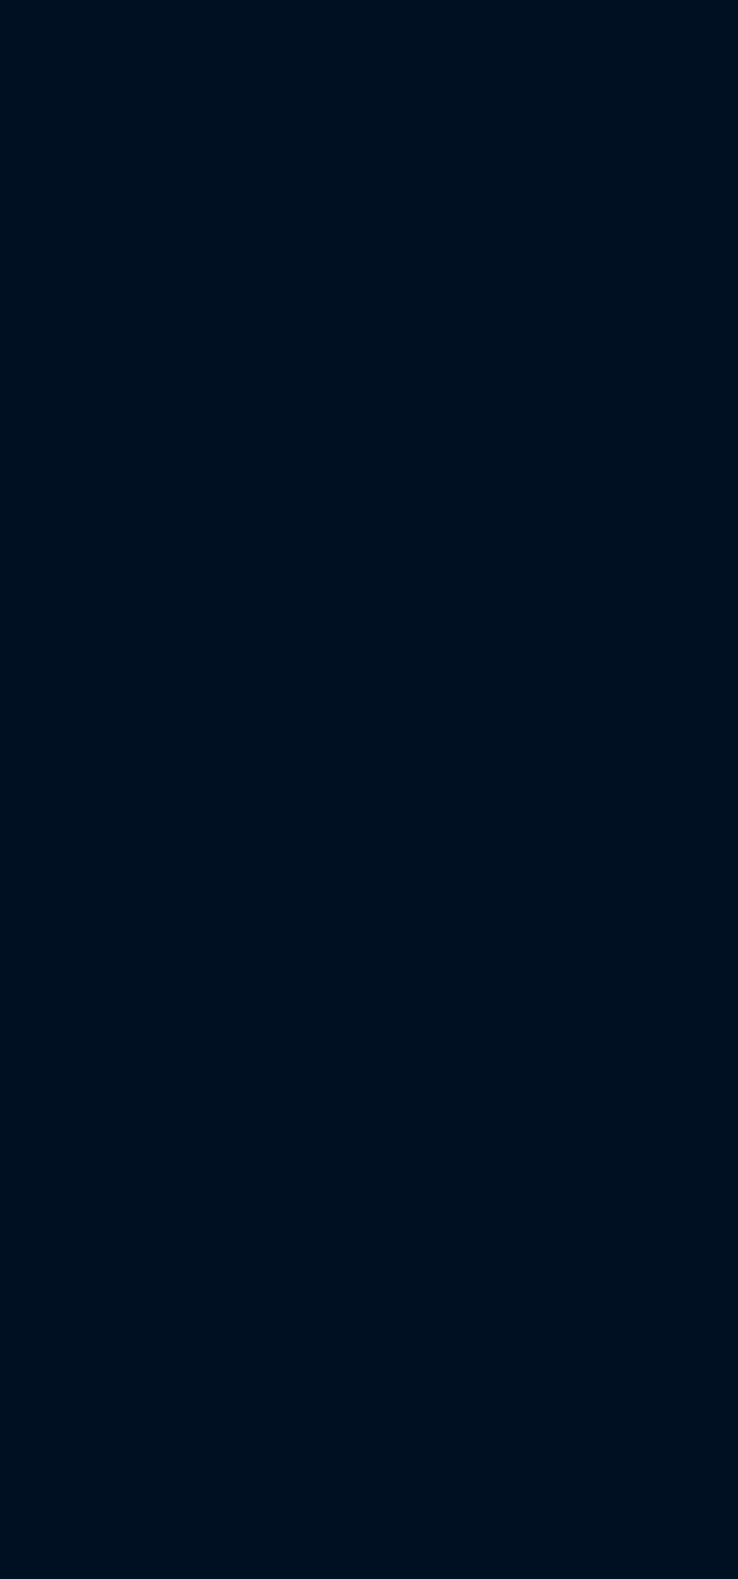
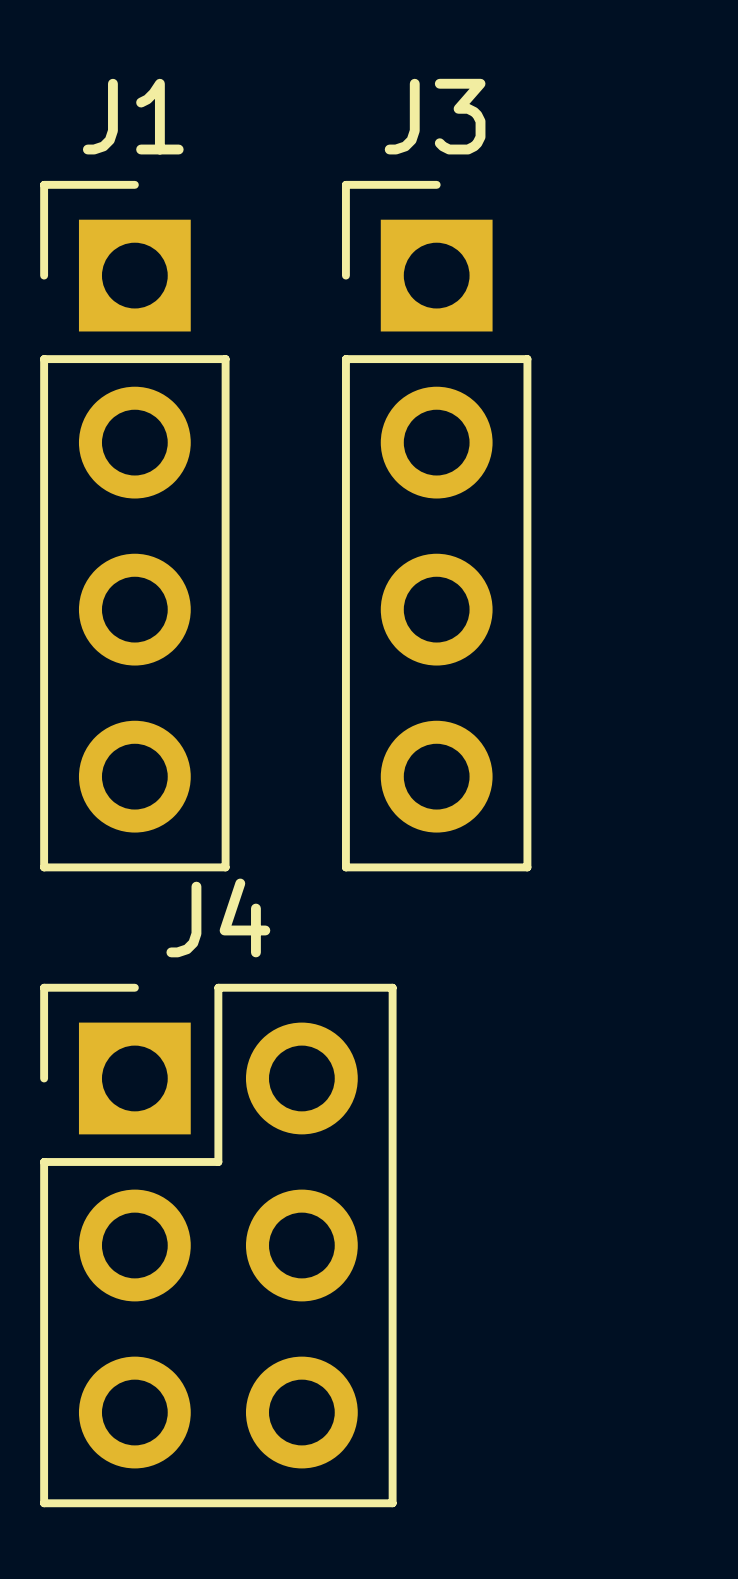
J1: none -> (134, 526)
J3: none -> (436, 526)
J4: none -> (218, 1245)

